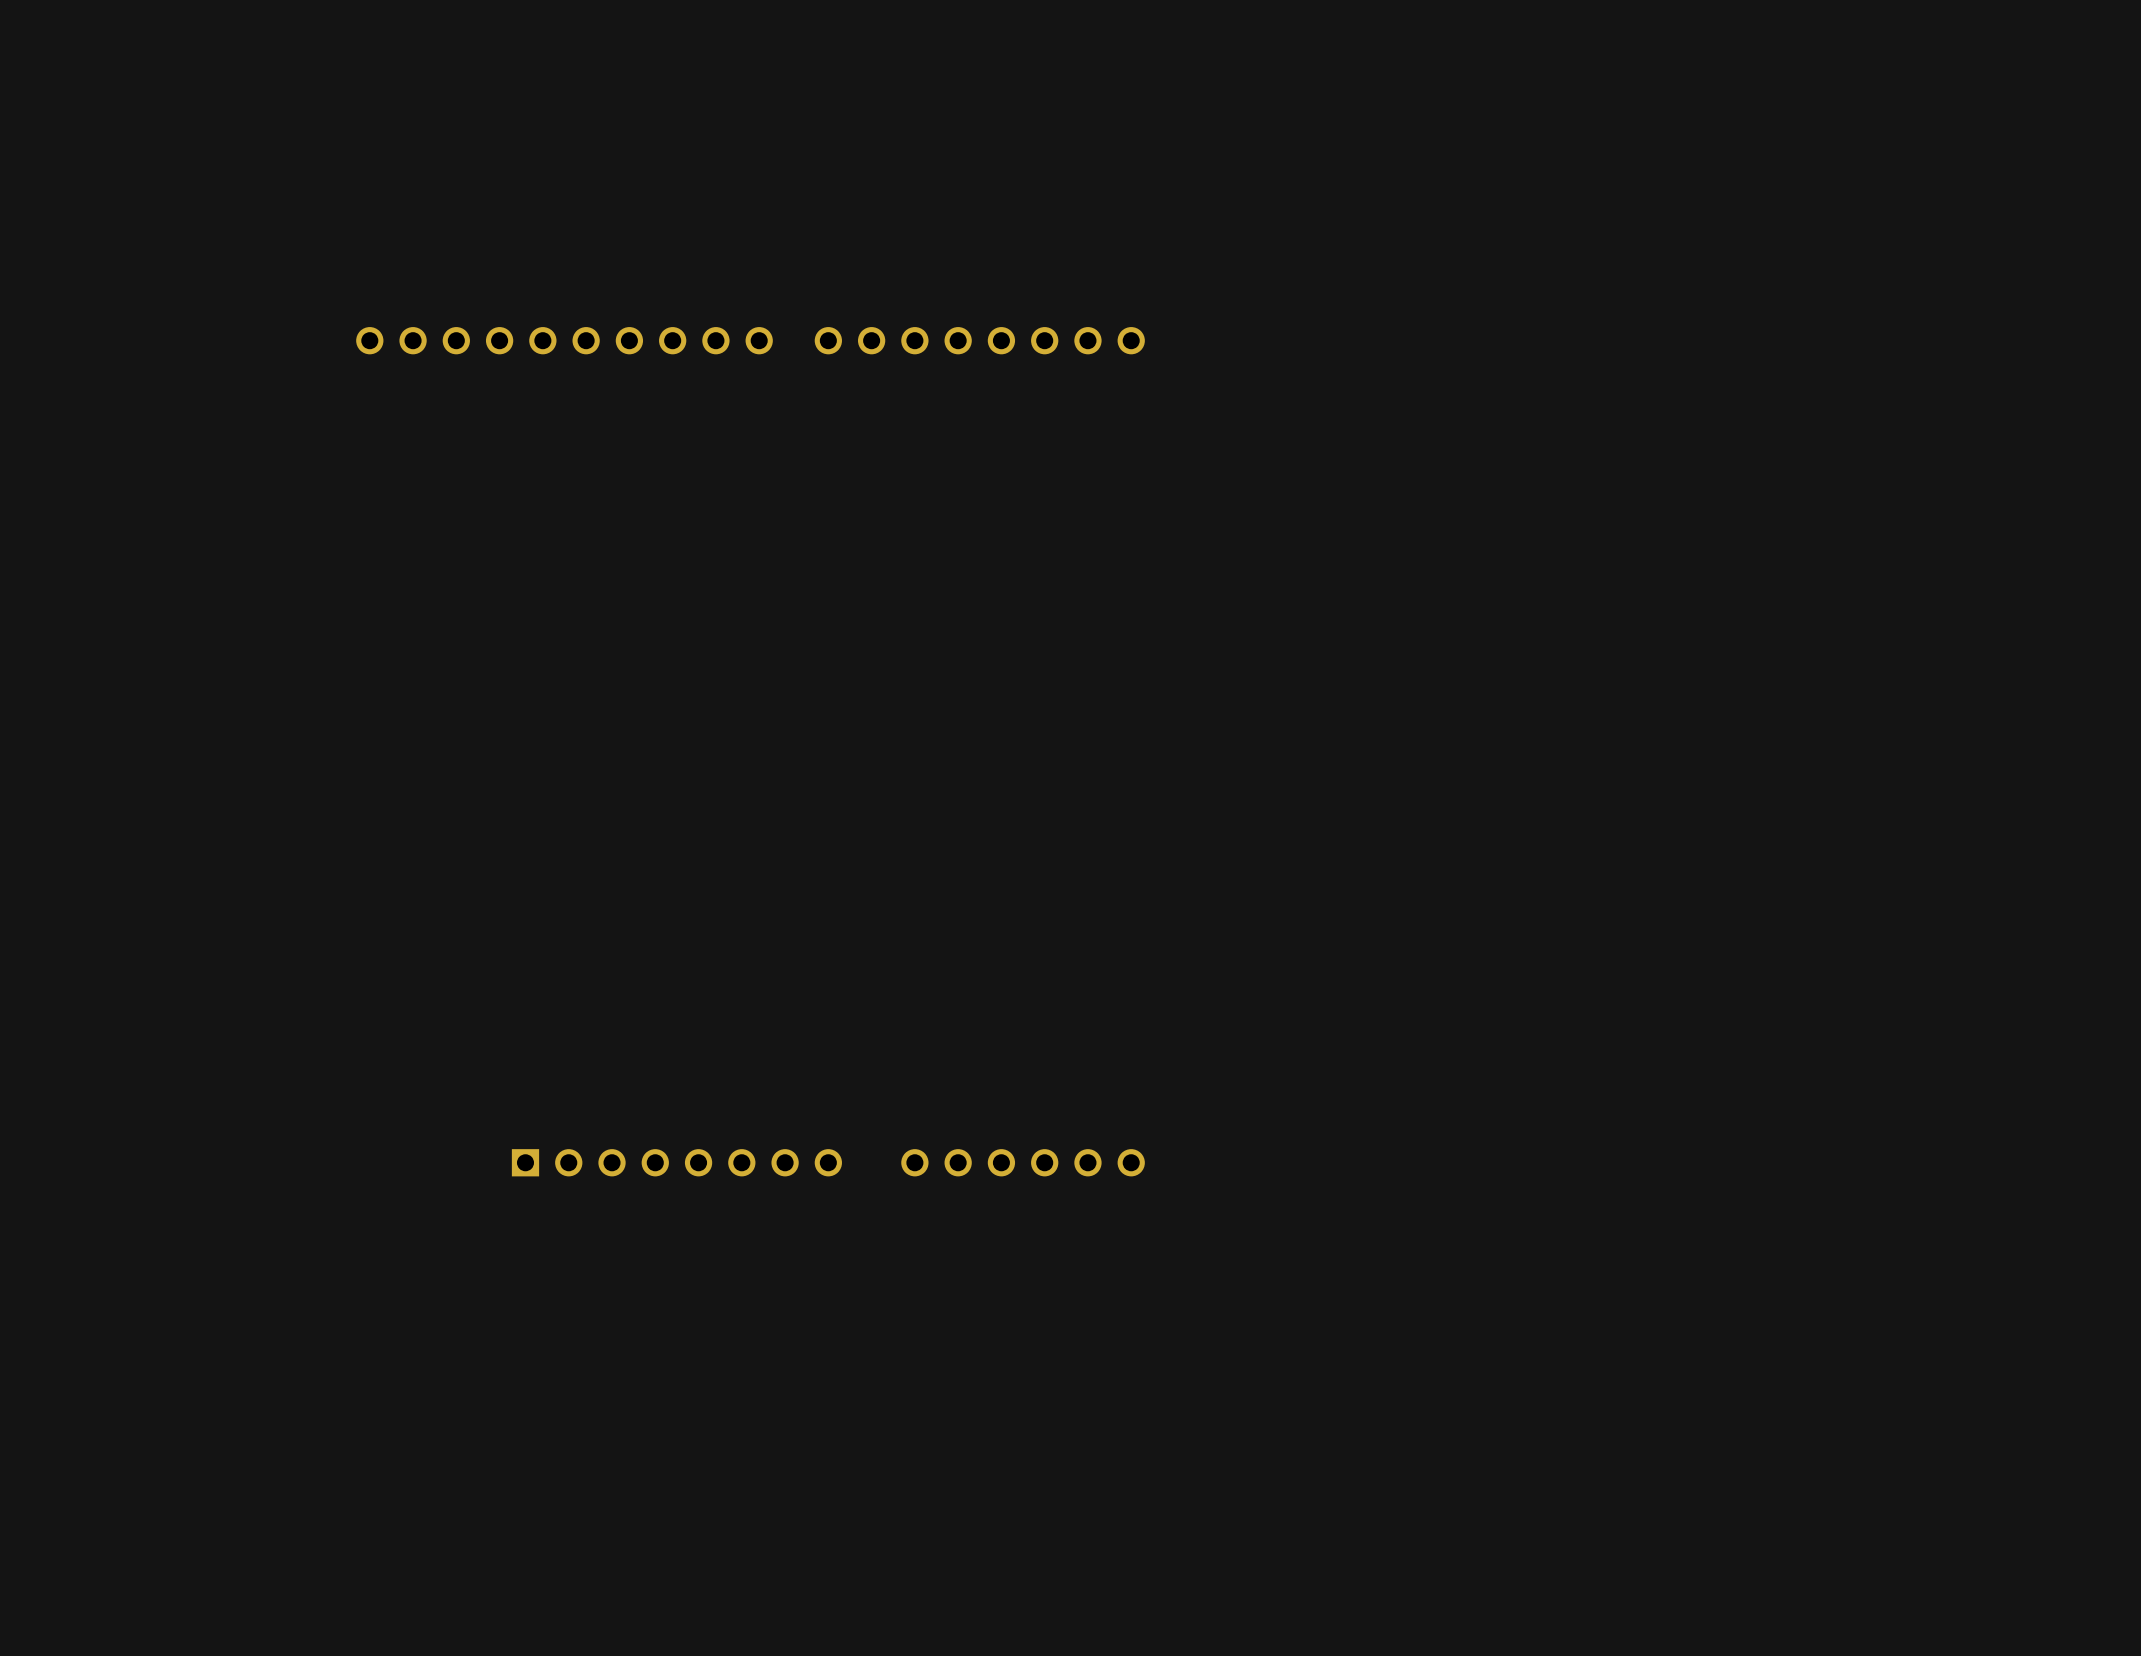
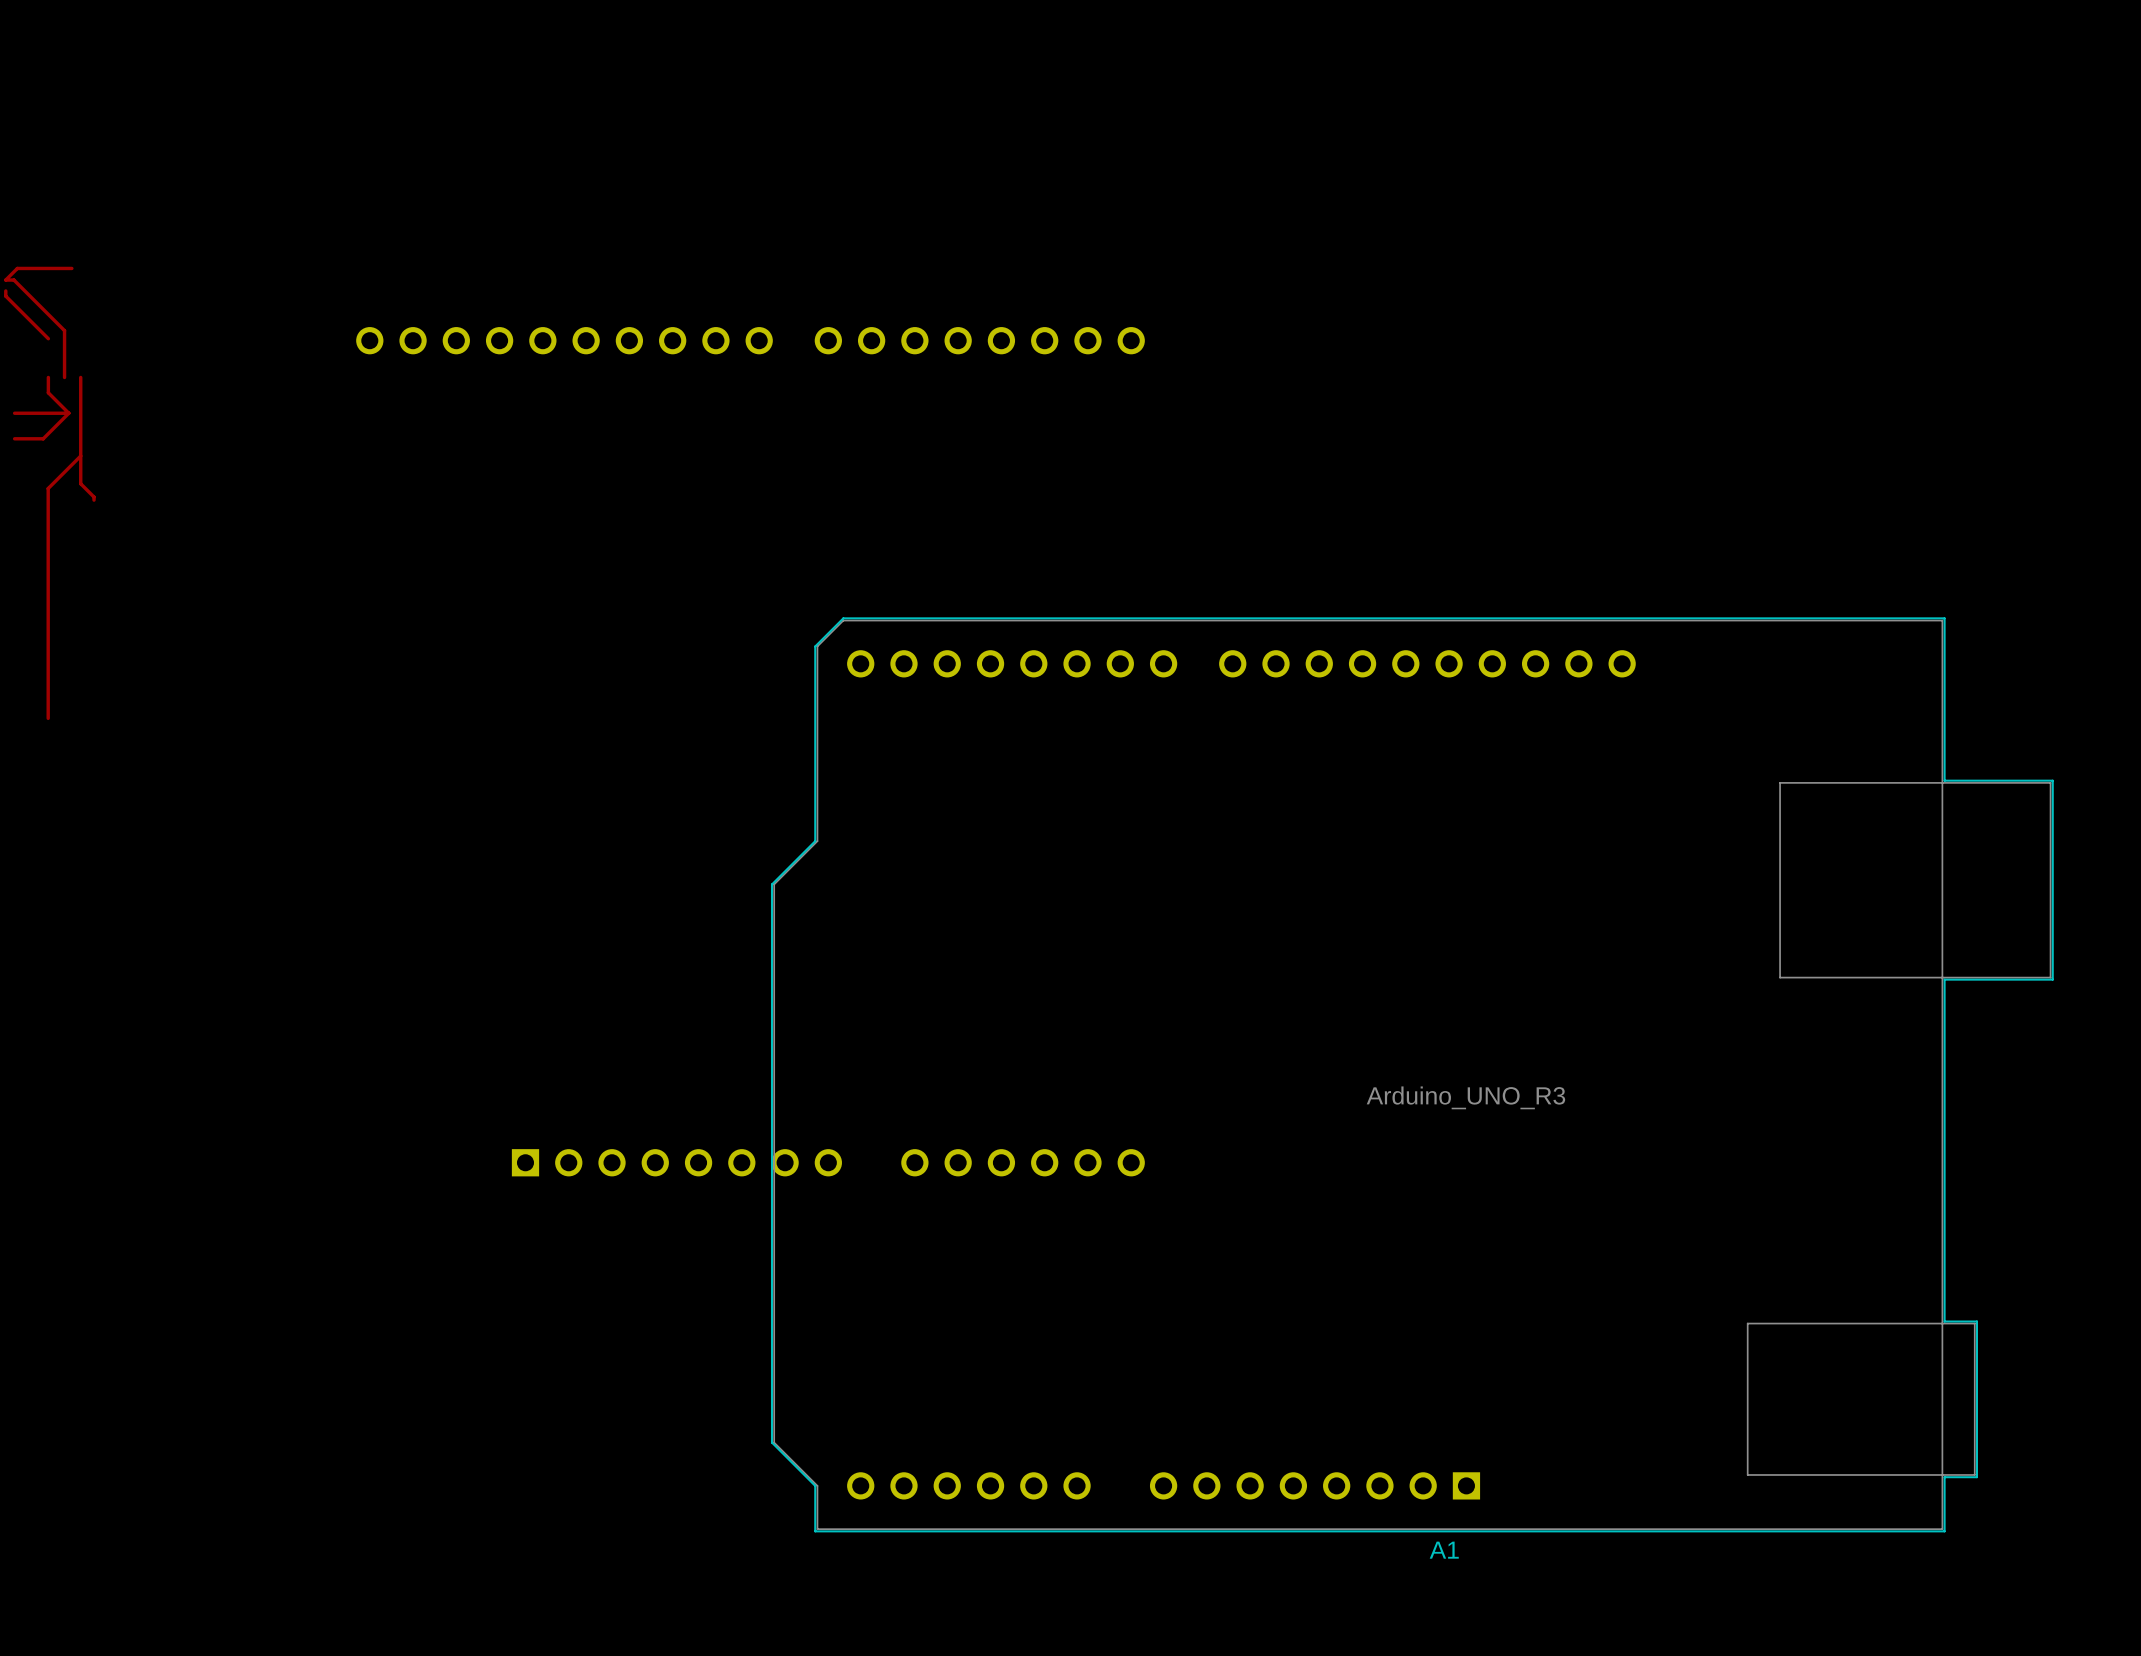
track: none -> (71, 268) (17, 268) (5, 280) (13, 280) (64, 330) (64, 377)
track: none -> (5, 290) (5, 296) (48, 338)
track: none -> (48, 377) (48, 392) (68, 413)
track: none -> (80, 377) (80, 483) (94, 497) (94, 500)
track: none -> (14, 413) (68, 413)
track: none -> (68, 413) (43, 438) (14, 438)
track: none -> (80, 456) (48, 488) (48, 718)
A1: none -> Arduino_UNO_R3 (1412, 1074)

